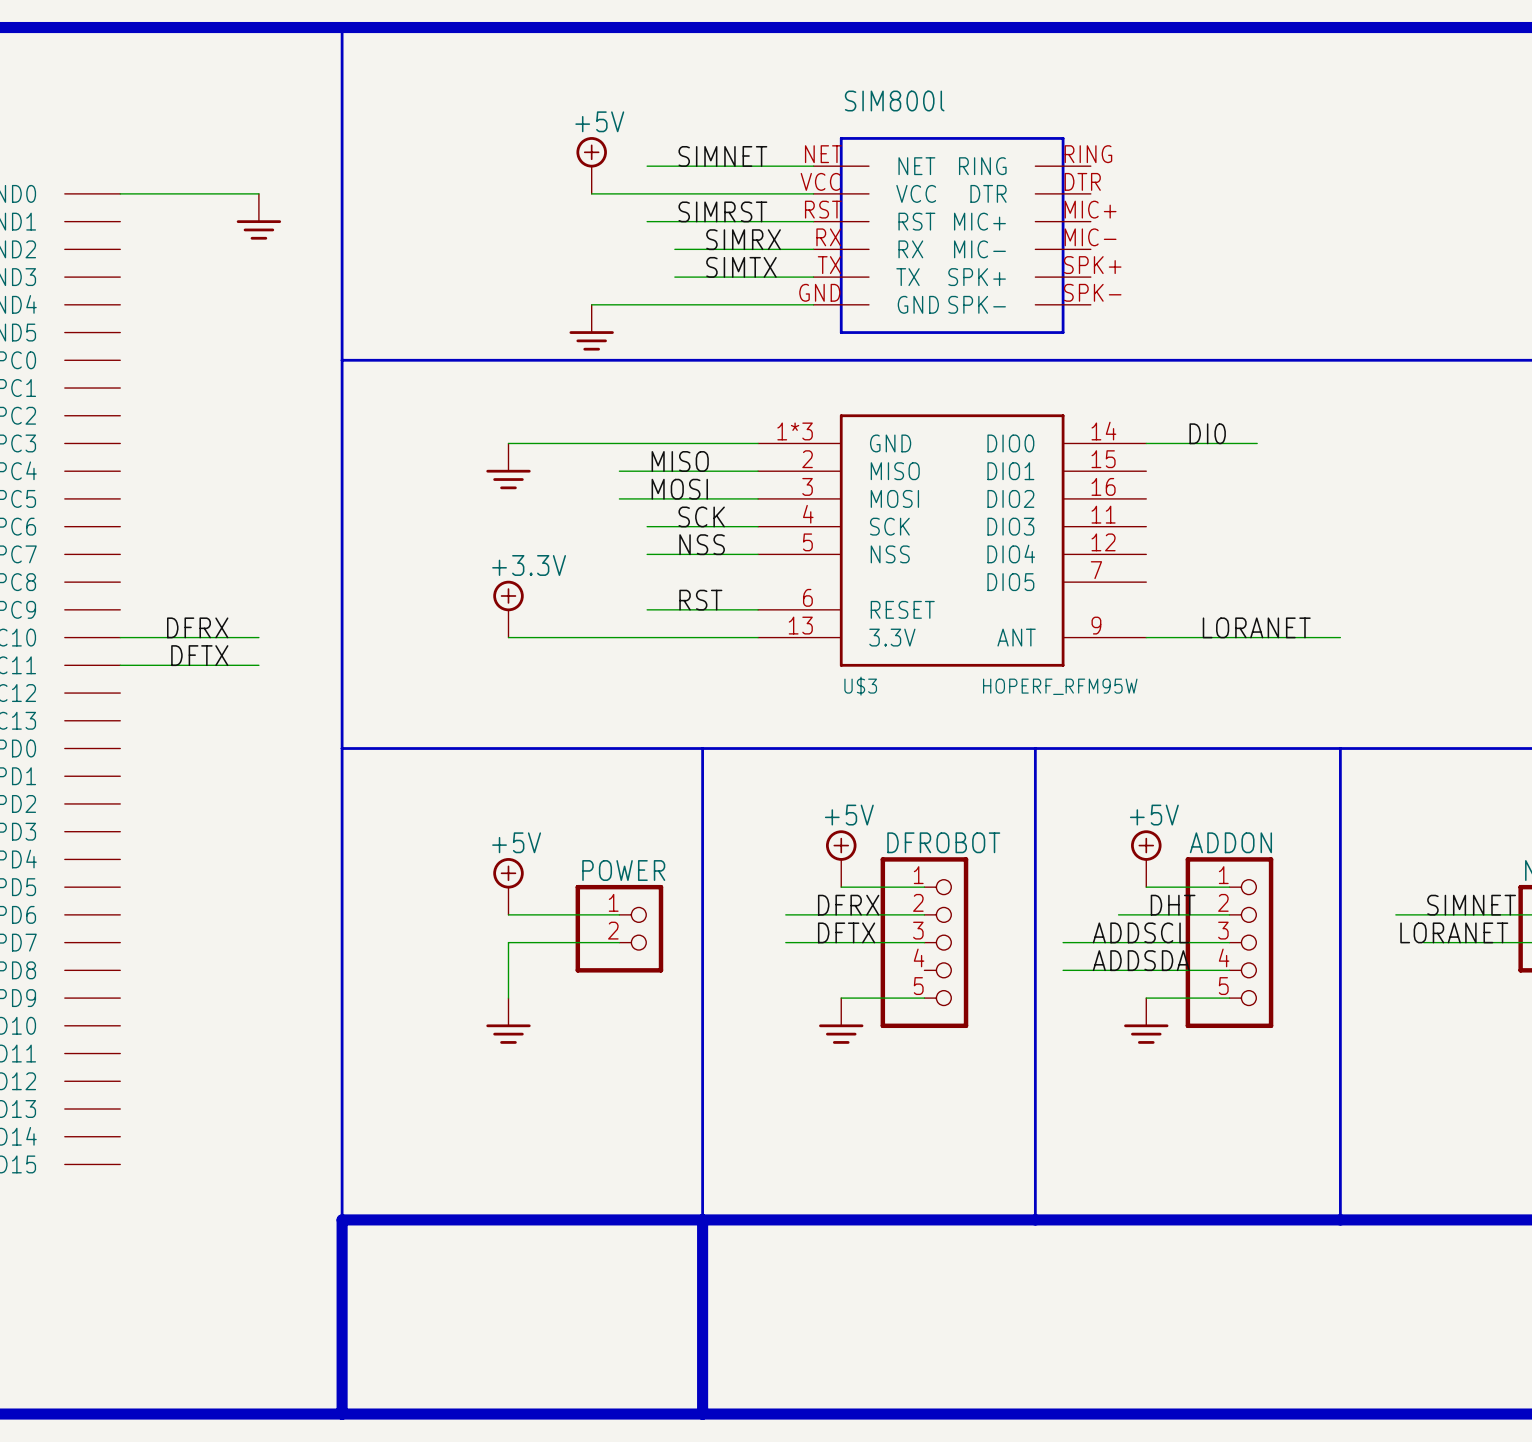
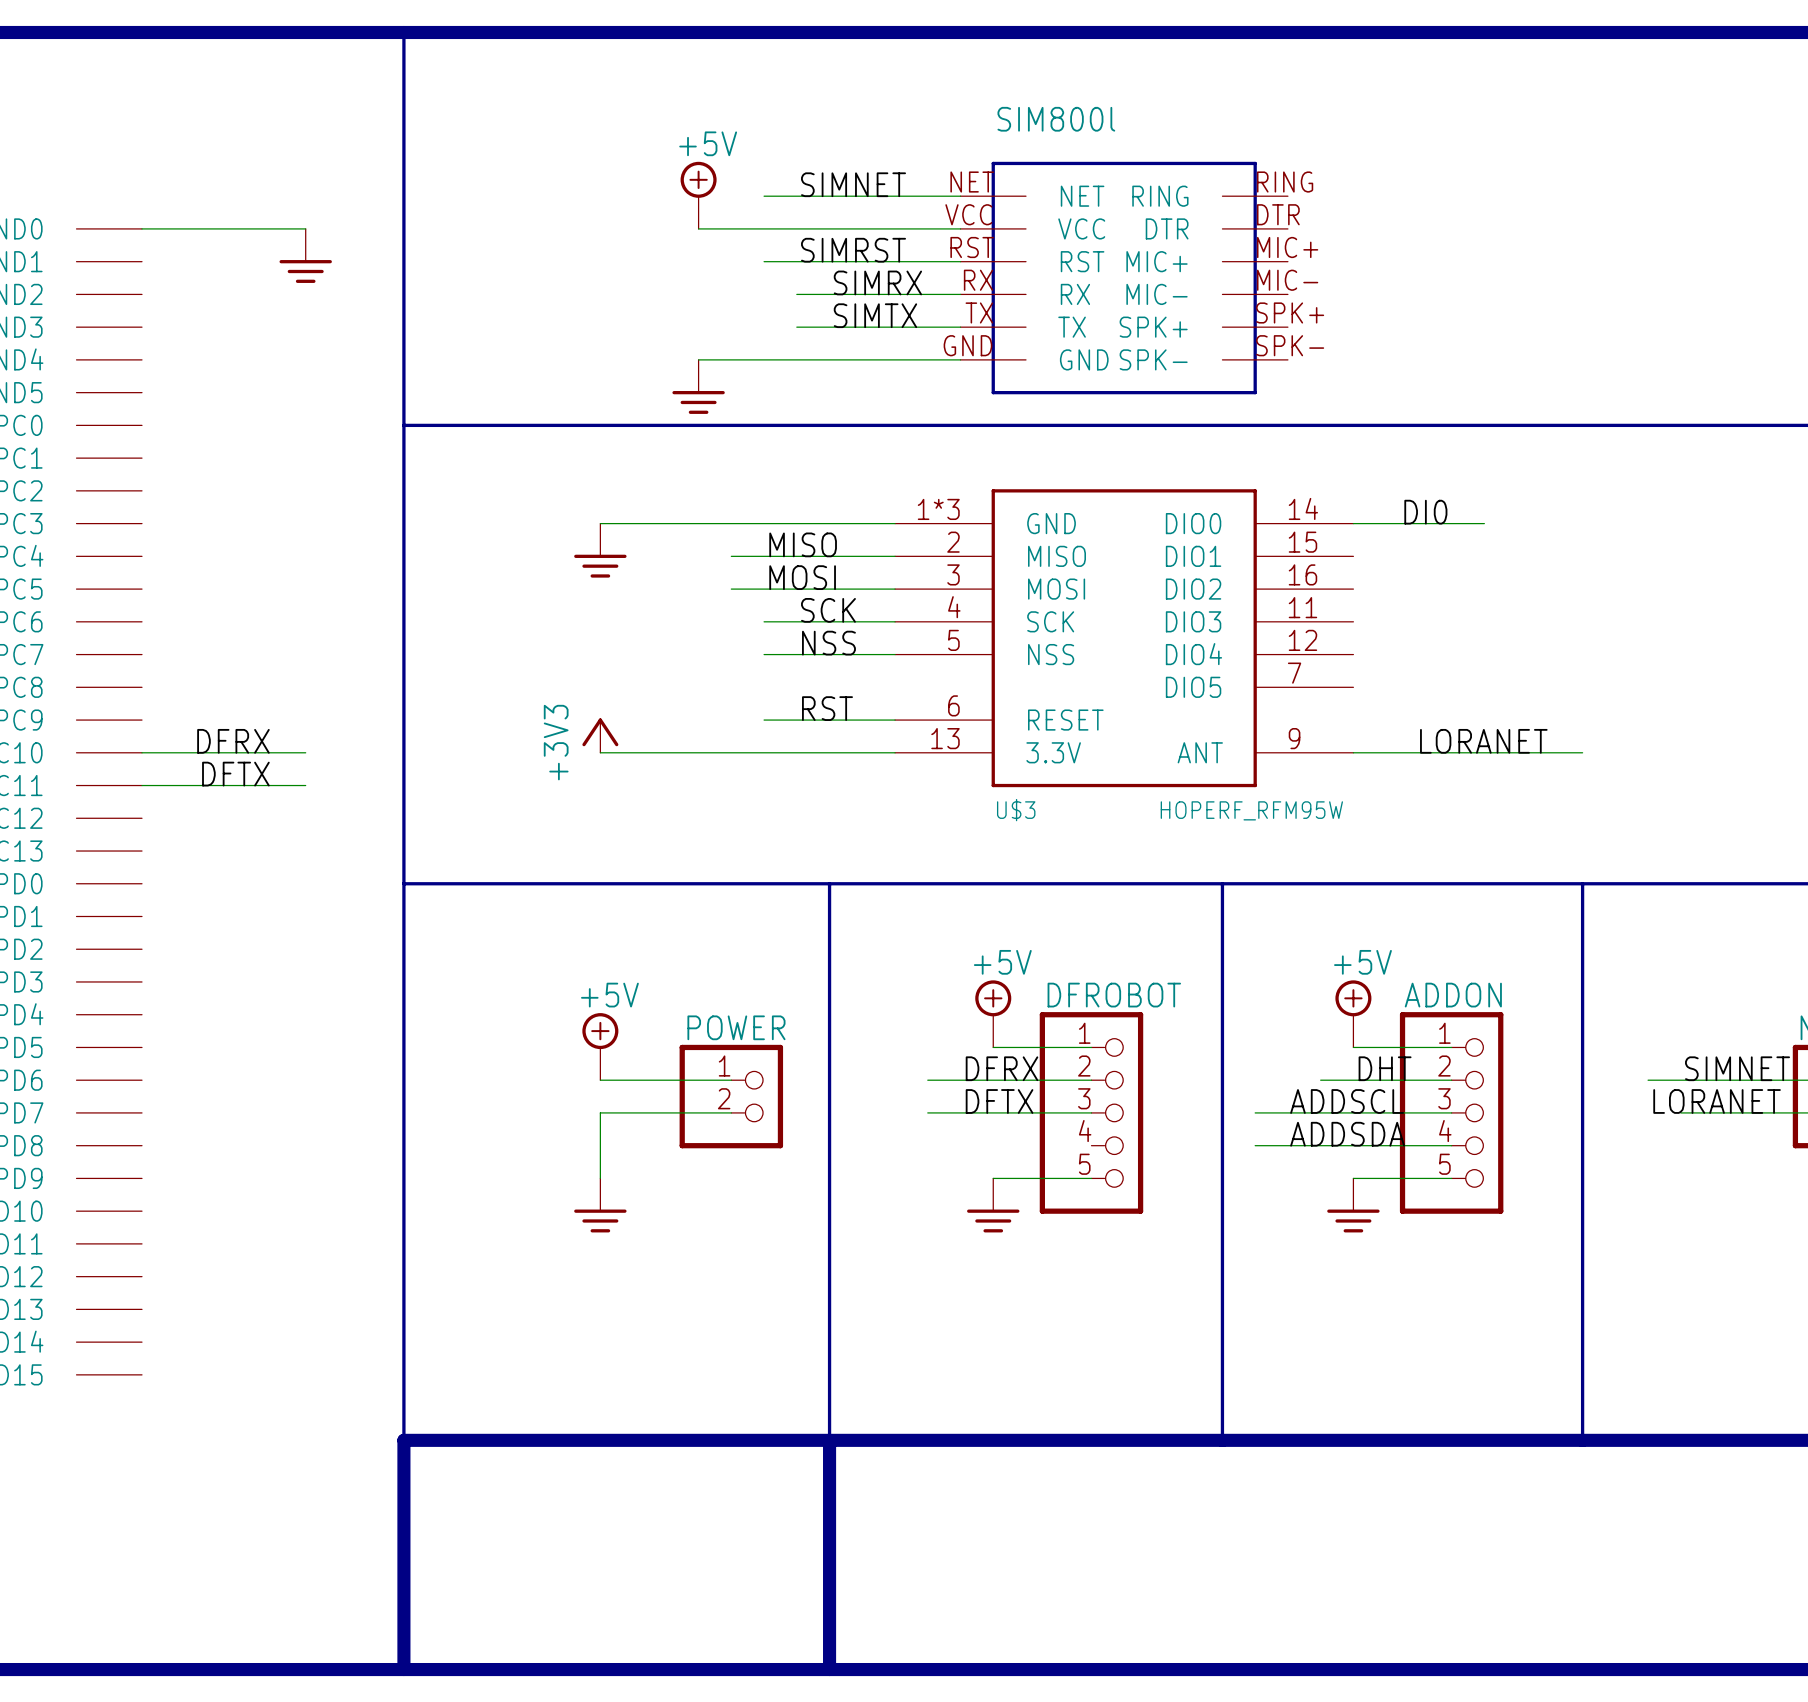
power symbol: +3.3V (508, 609) -> none
power symbol: none -> +3V3 (600, 735)

